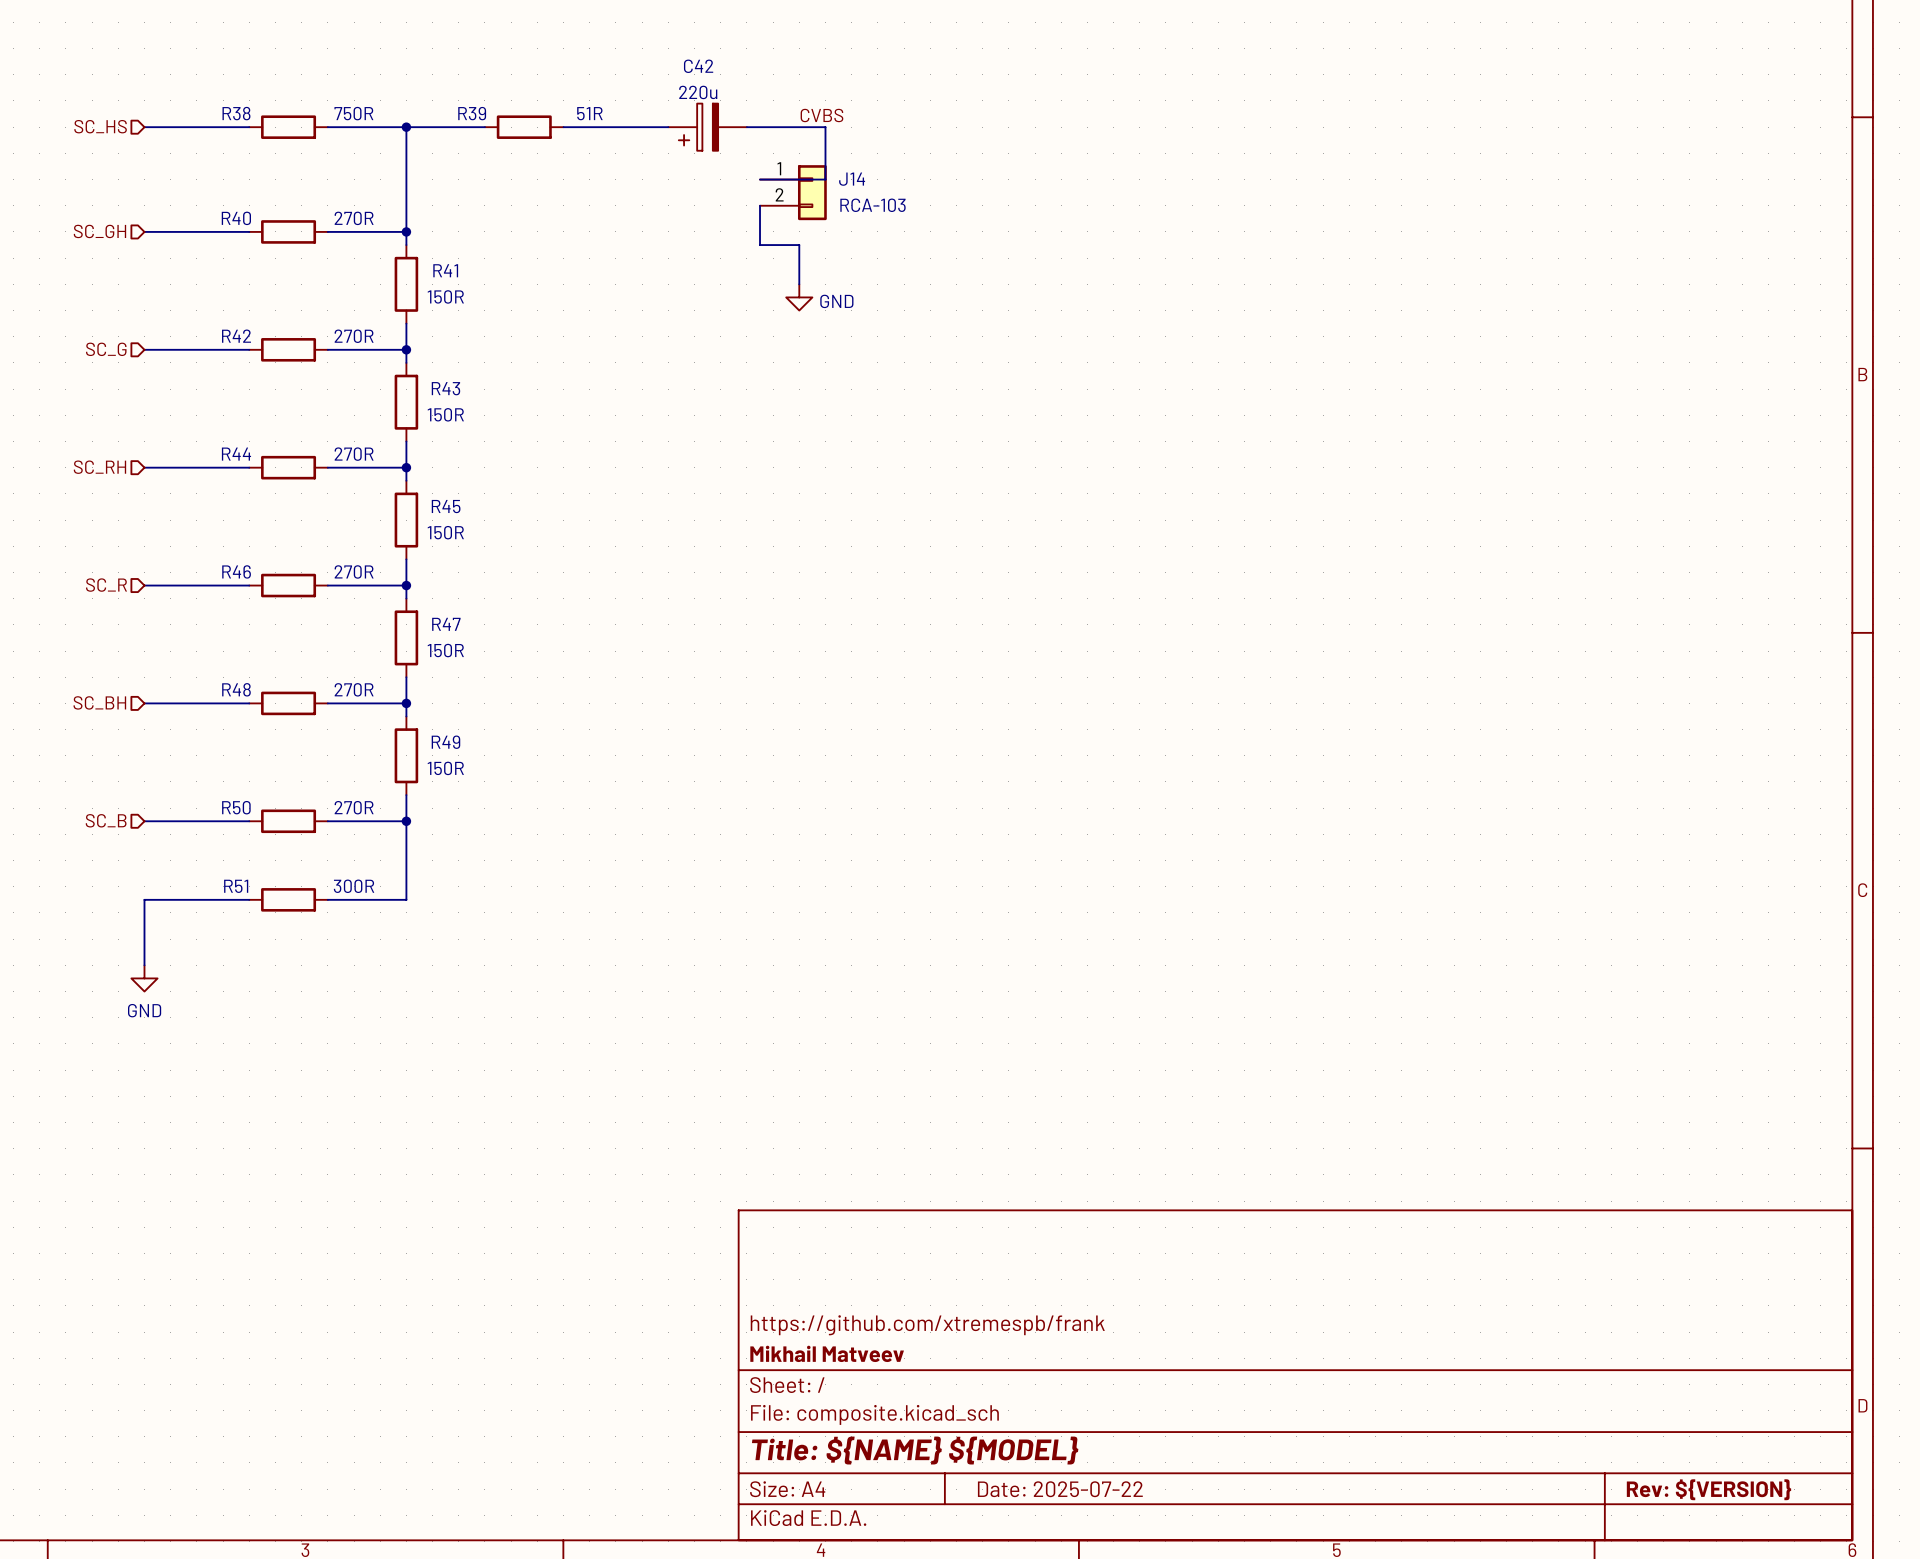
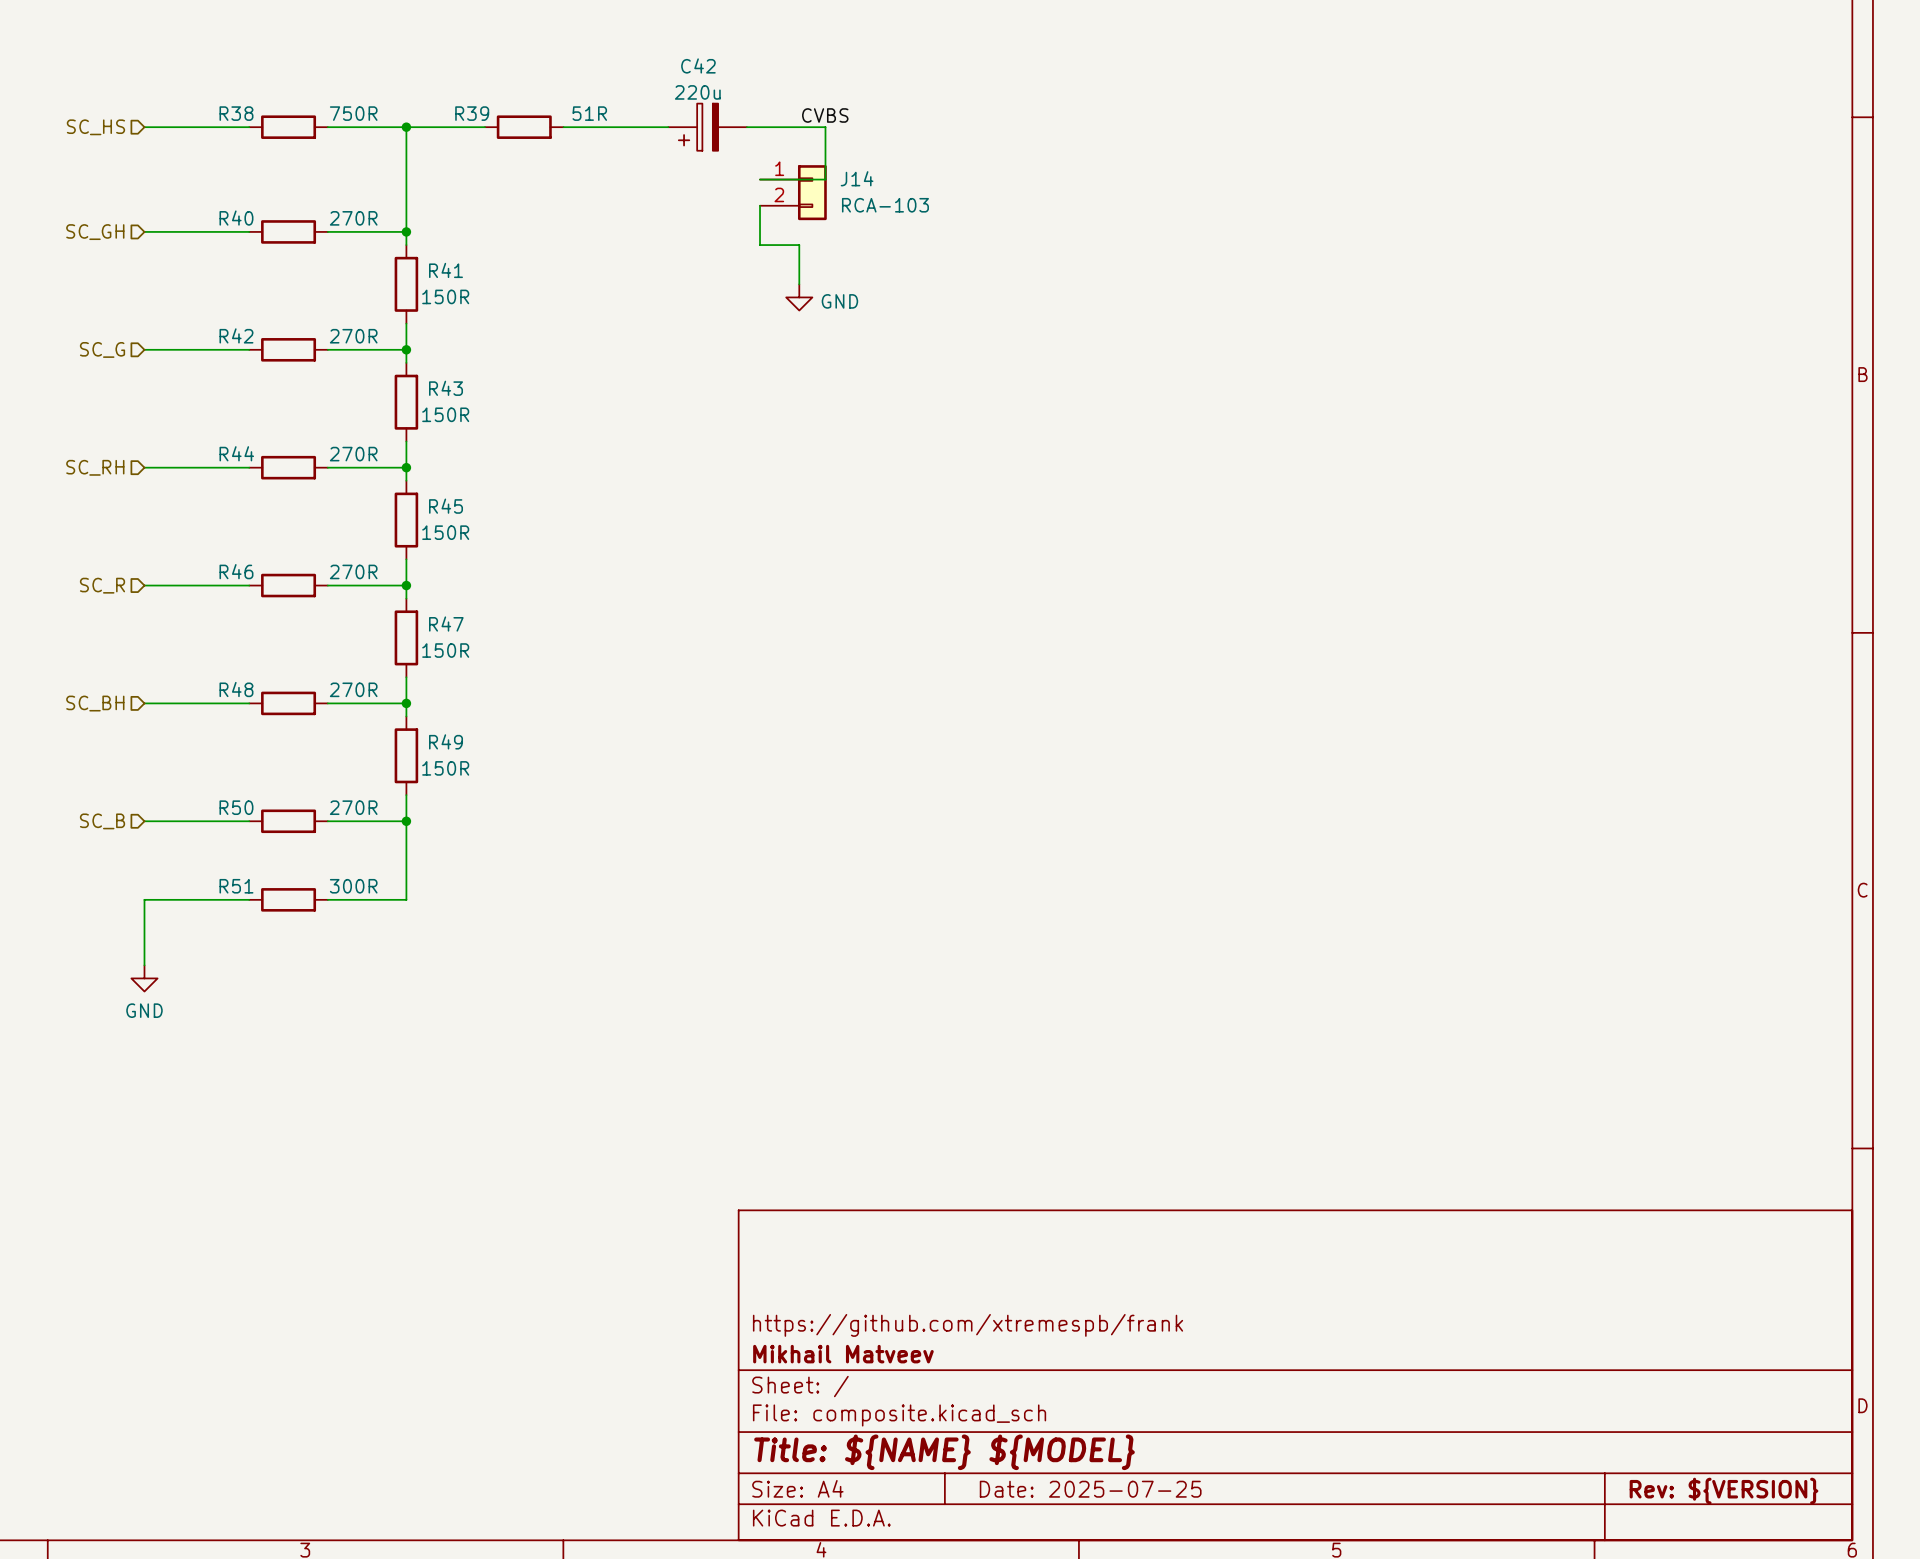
title block: Date: 2025-07-22 (1060, 1489) -> Date: 2025-07-25 (1090, 1489)

